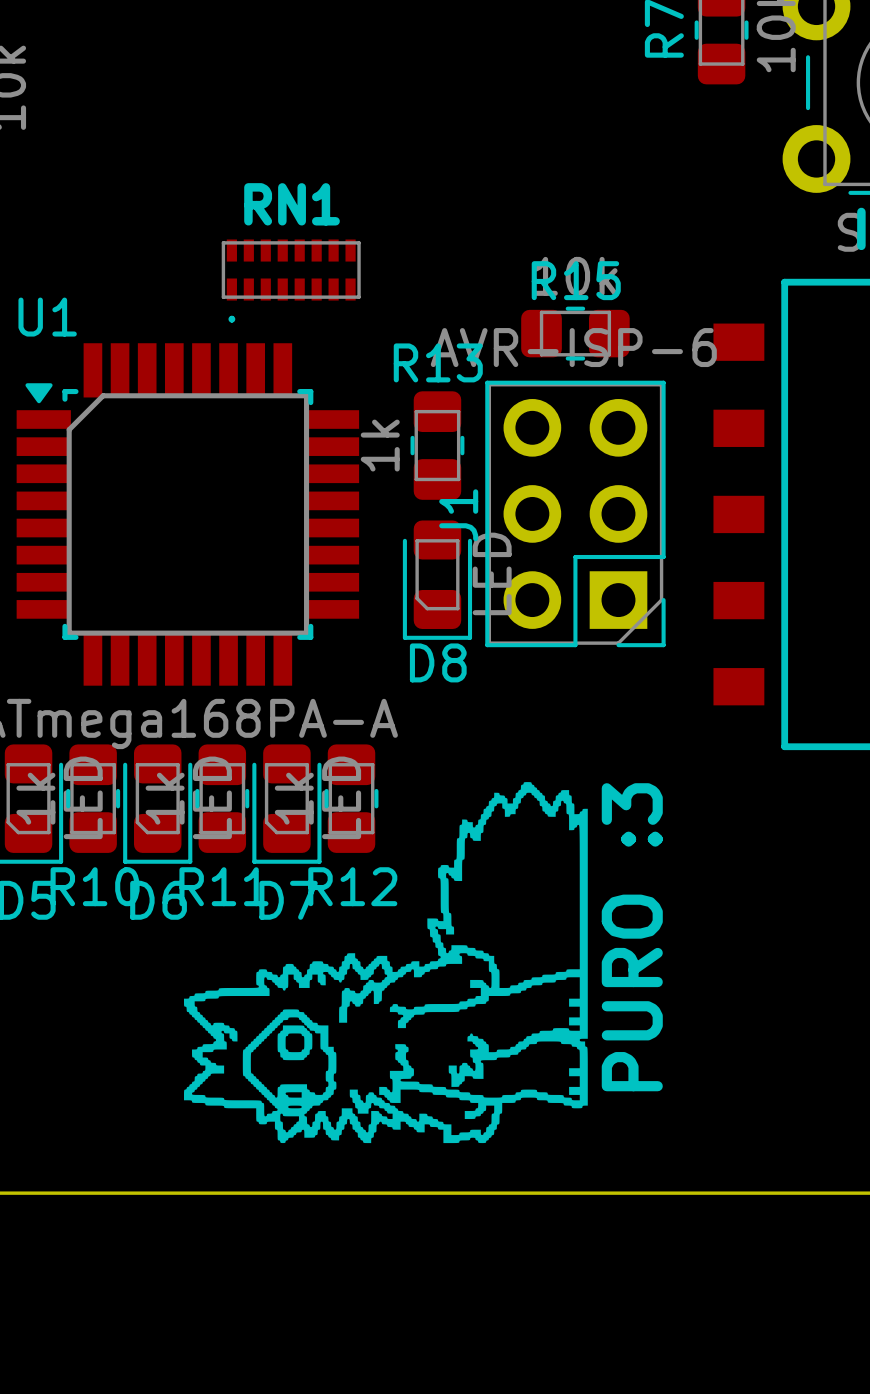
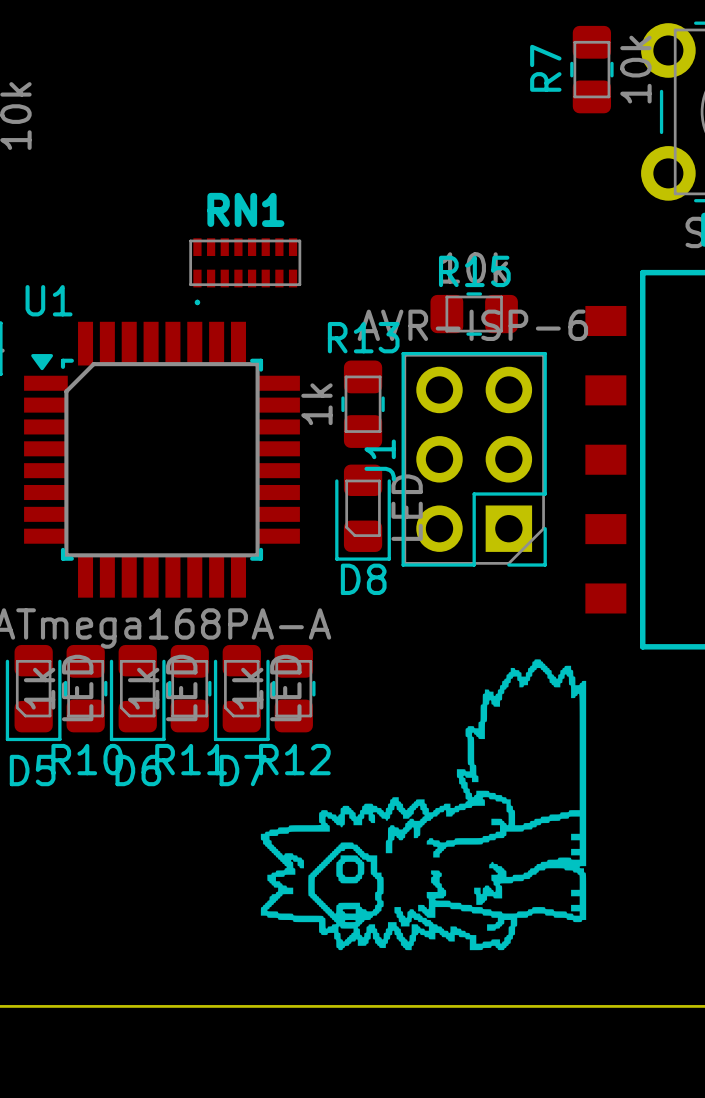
text: PURO :3 (632, 937) -> none
drawing position: (385, 962) -> (423, 804)

